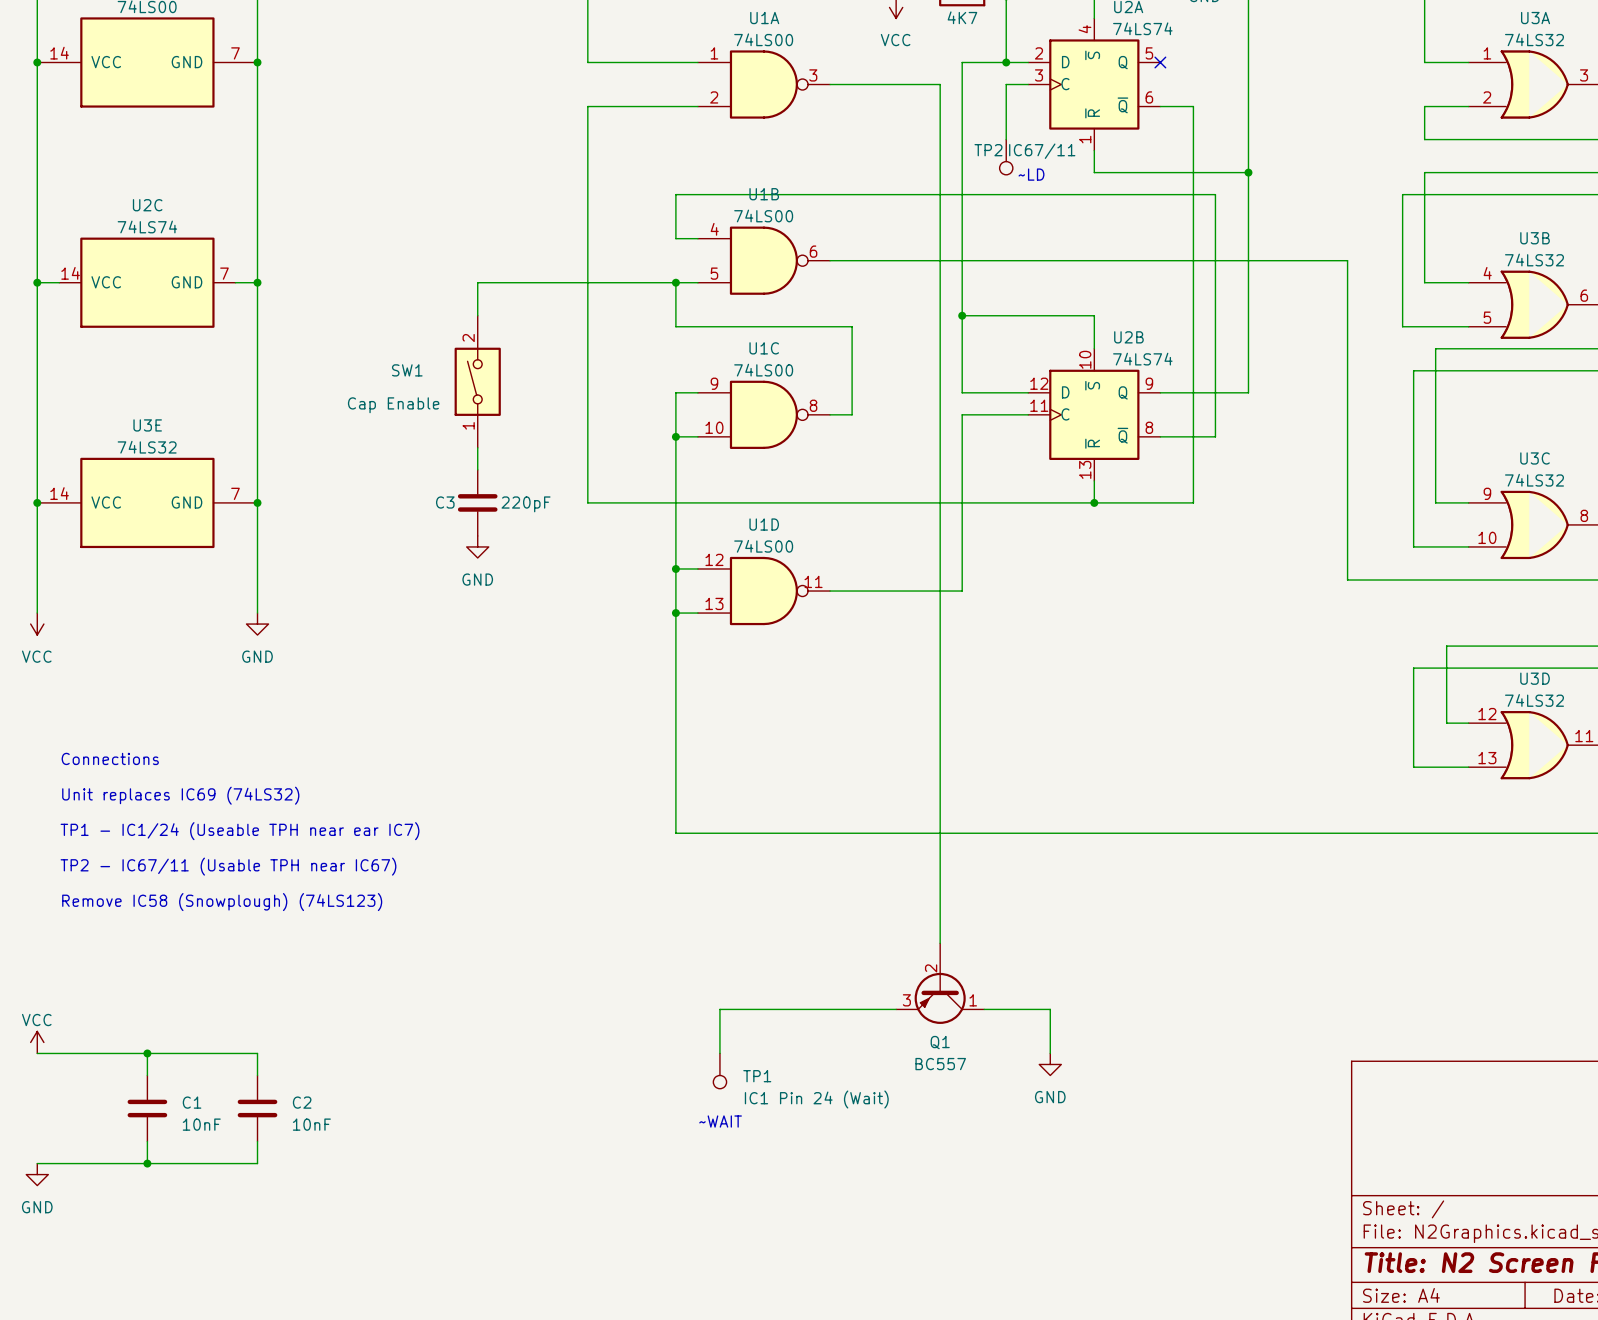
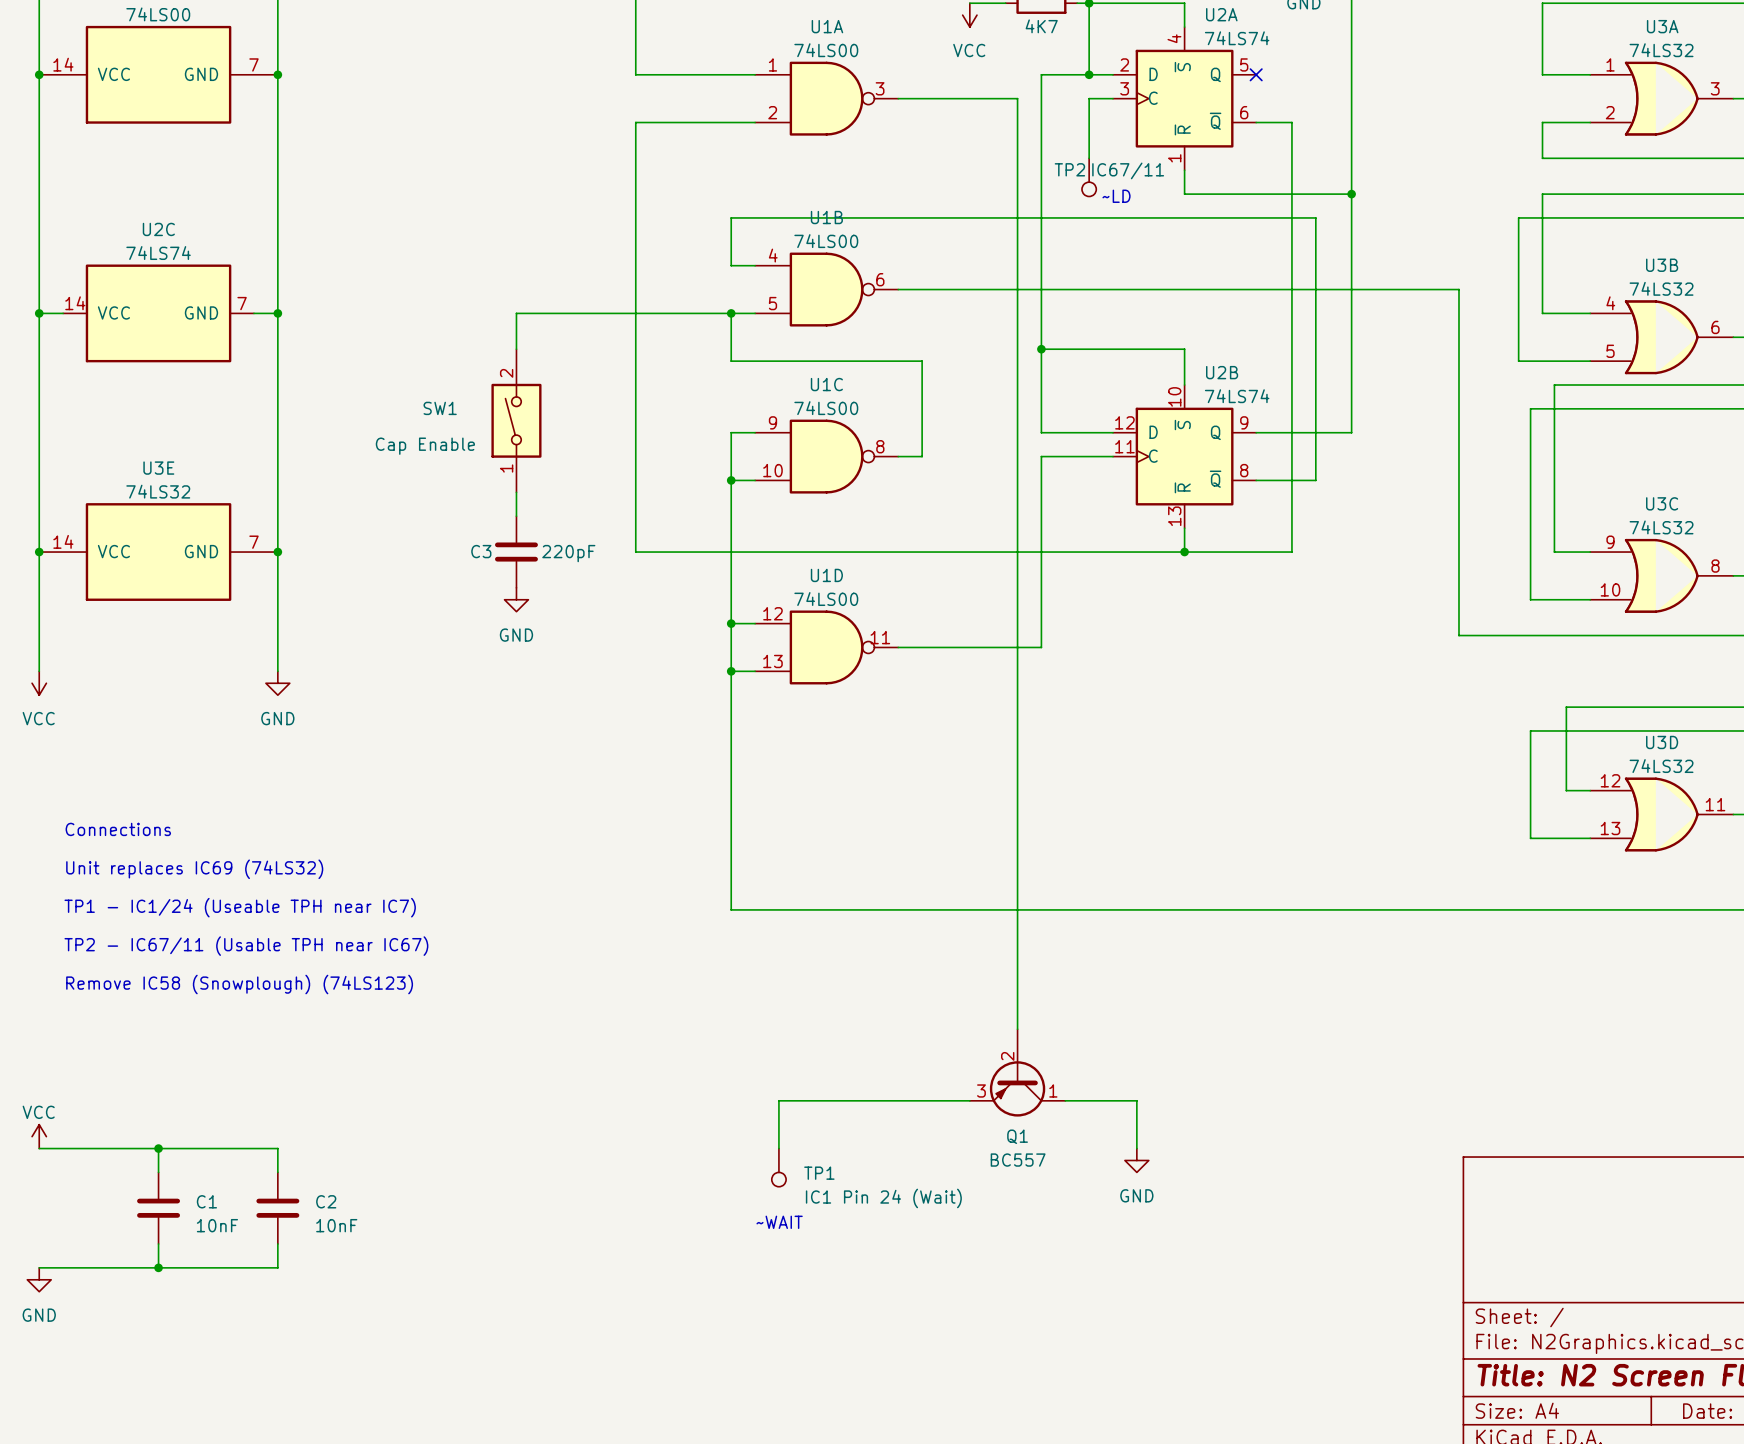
text: TP1 - IC1/24 (Useable TPH near ear IC7) (240, 831) -> TP1 - IC1/24 (Useable TPH near IC7) (240, 907)

